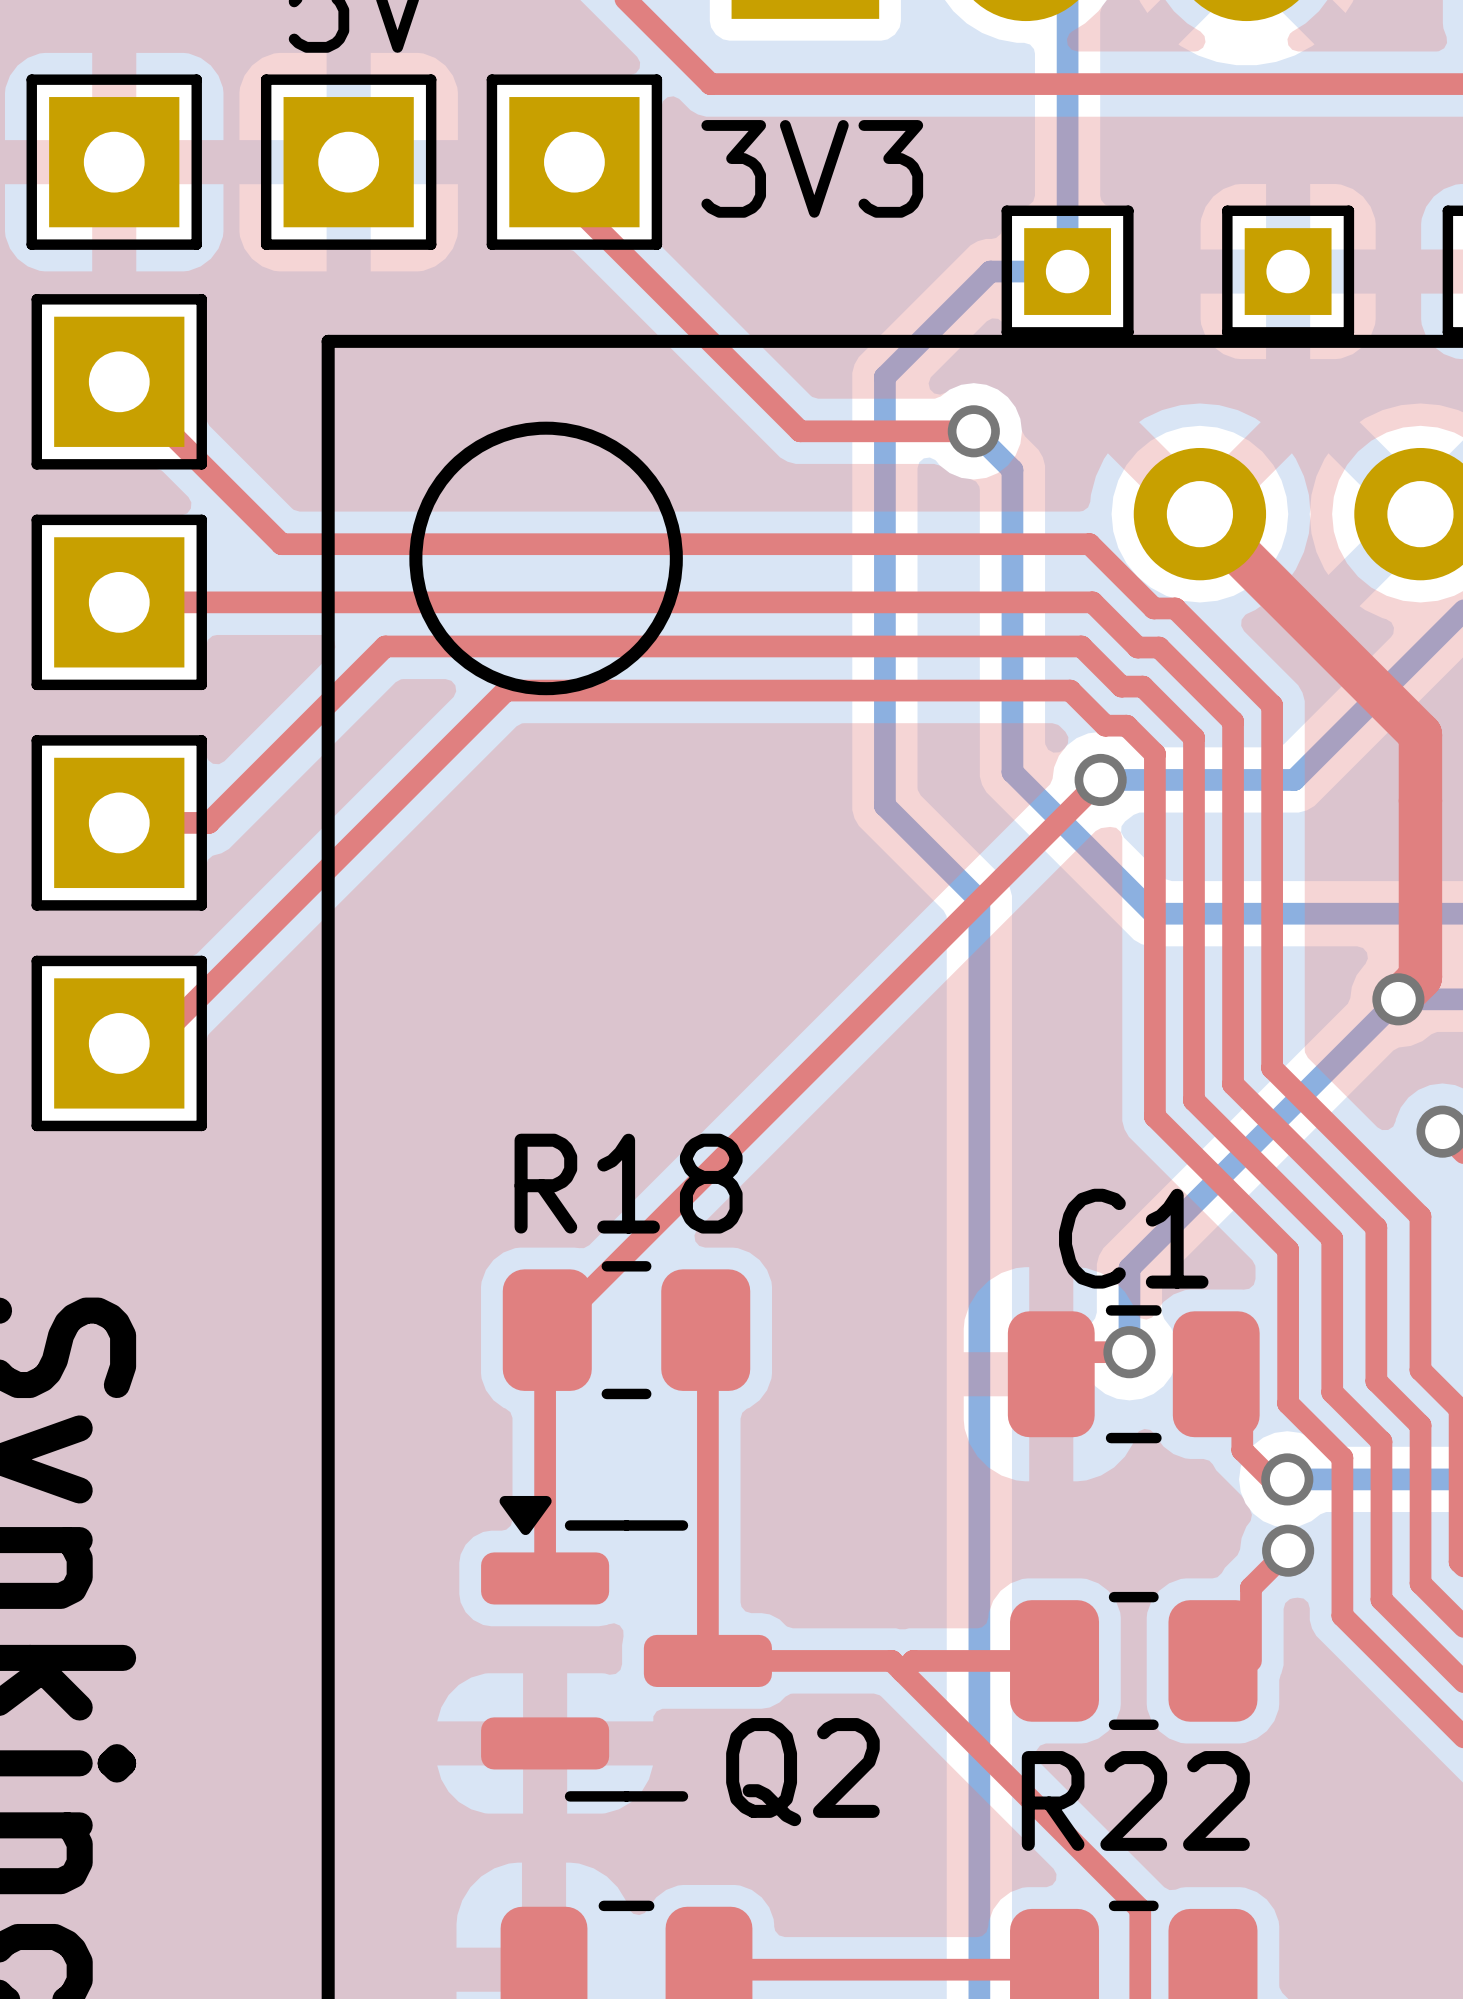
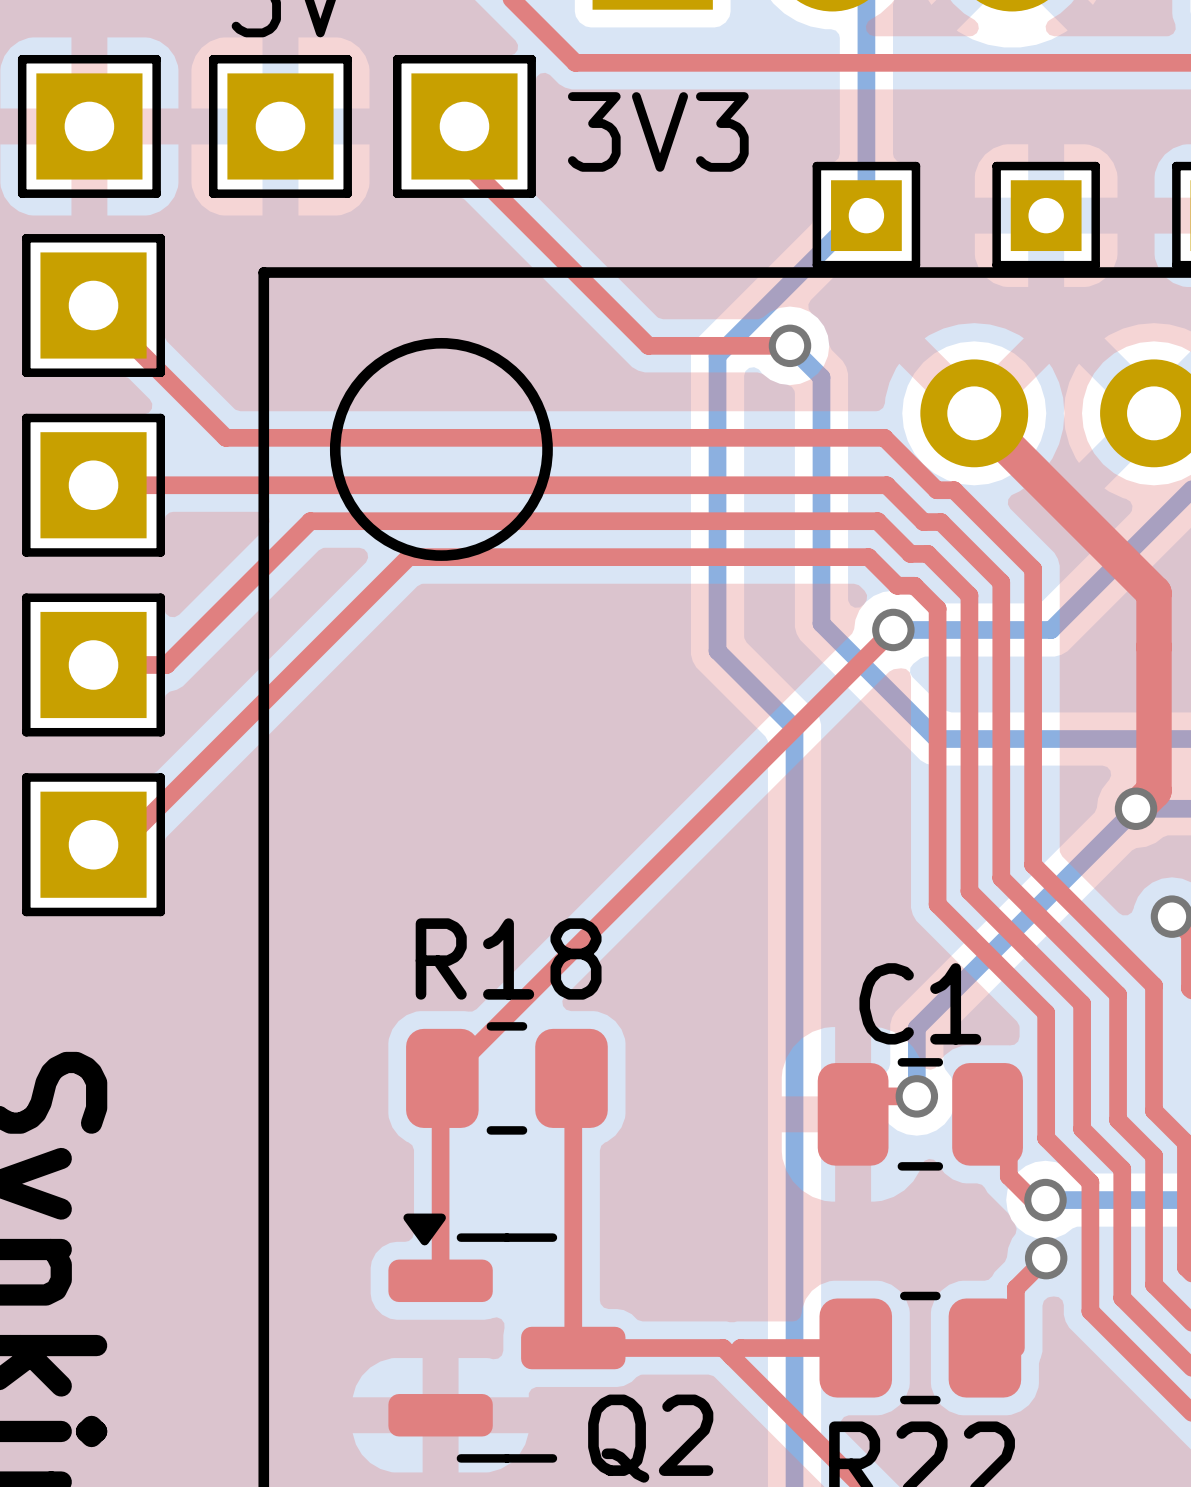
bottom track: (1056, 271) (990, 271) (884, 377) (884, 443) -> (857, 215) (717, 355)

